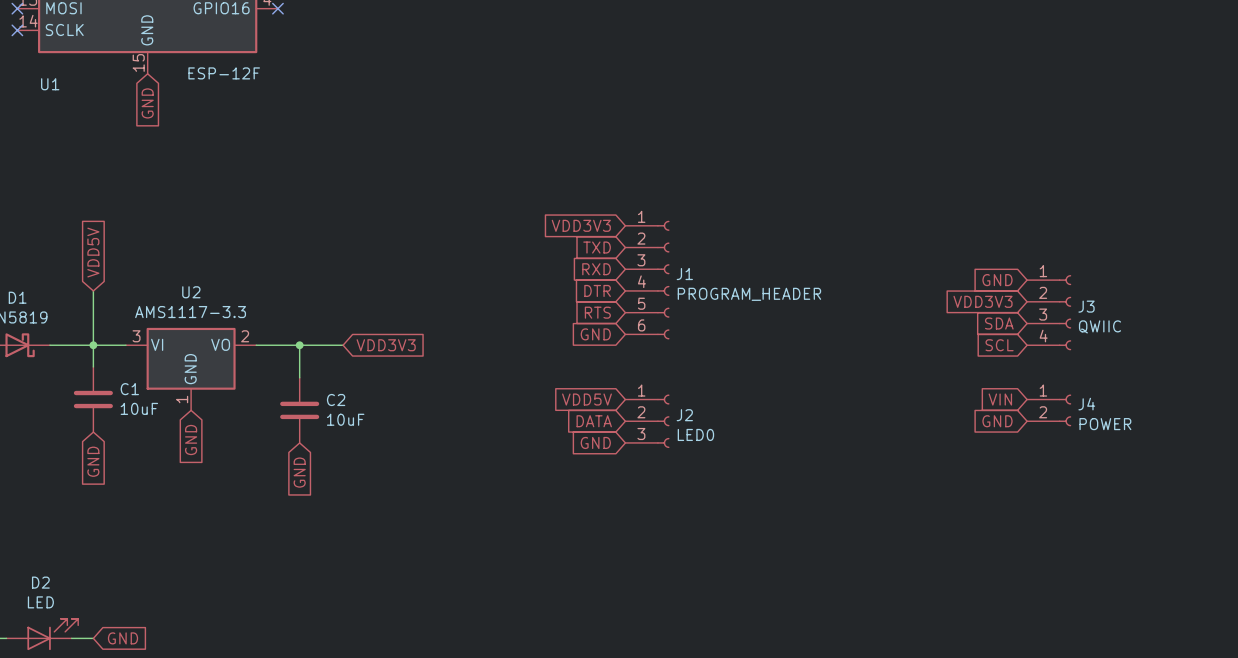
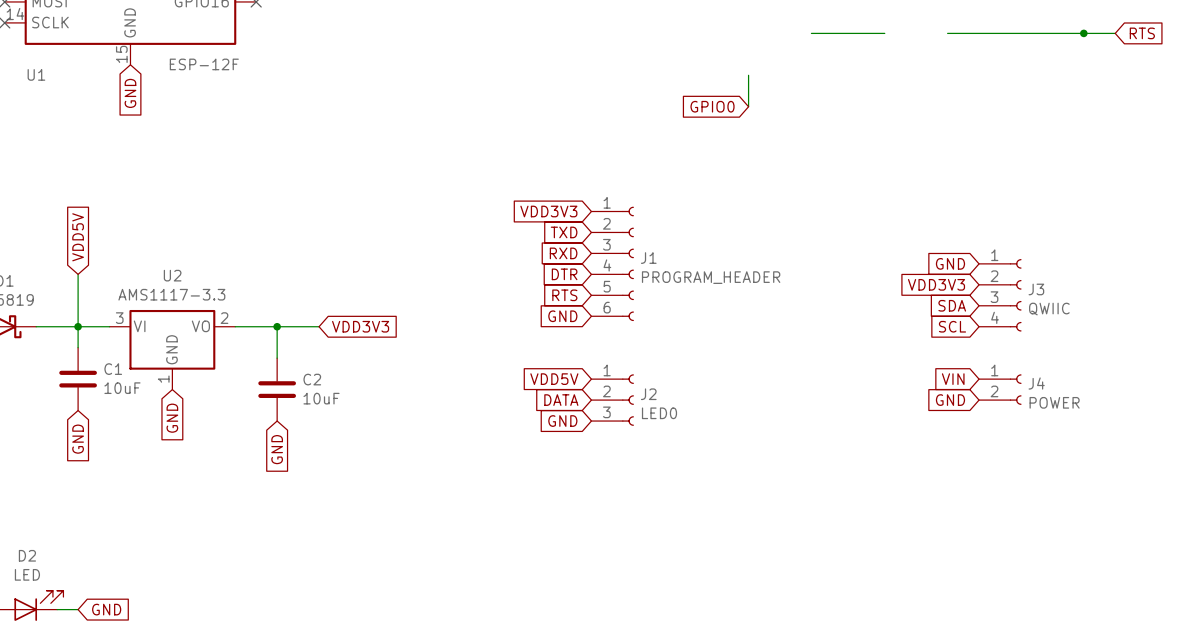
wire: none -> (811, 33) (884, 33)
wire: none -> (947, 33) (1115, 33)
junction: none -> (1083, 33)
global label: none -> RTS (1142, 33)
wire: none -> (748, 75) (748, 106)
global label: none -> GPIO0 (712, 106)

